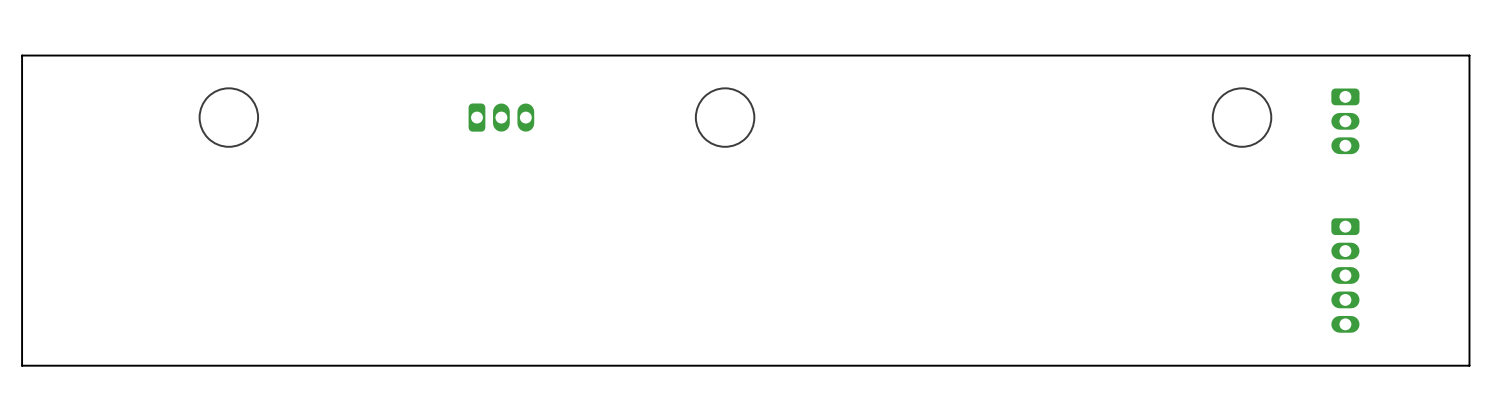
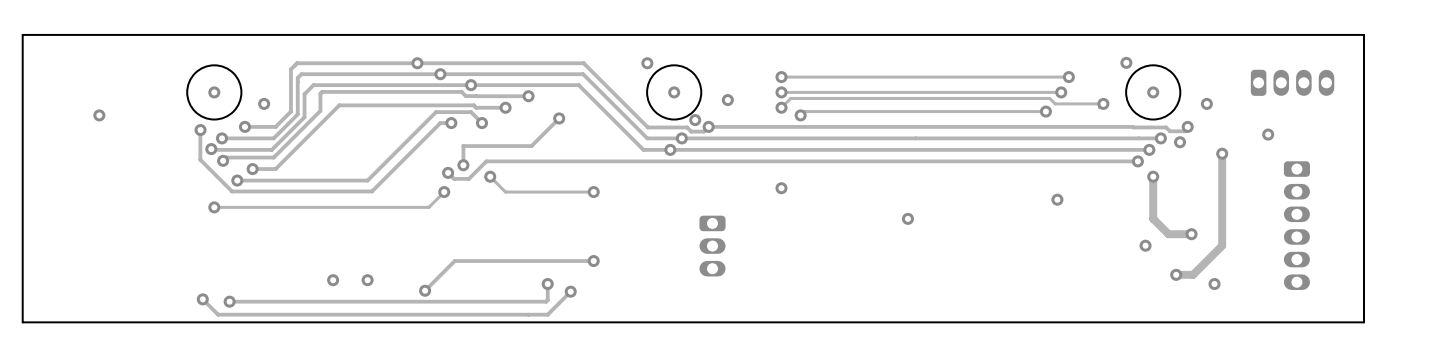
via: none -> (1126, 62)
via: none -> (417, 63)
via: none -> (647, 63)
via: none -> (440, 74)
via: none -> (781, 77)
track: none -> (1068, 77) (781, 77)
via: none -> (1068, 77)
part: none -> (1292, 82)
via: none -> (471, 85)
via: none -> (214, 92)
part: (501, 117) -> none
via: none -> (674, 92)
via: none -> (781, 92)
track: none -> (1061, 92) (781, 92)
via: none -> (1061, 92)
via: none -> (1153, 92)
track: none -> (476, 96) (465, 96) (461, 91) (322, 91) (320, 110) (273, 157) (226, 157) (223, 160)
track: none -> (528, 96) (476, 96)
via: none -> (528, 96)
part: (1345, 121) -> none
via: none -> (727, 100)
via: none -> (264, 103)
via: none -> (1103, 103)
via: none -> (1206, 103)
track: none -> (505, 107) (476, 107) (473, 105) (339, 105) (275, 169) (252, 169)
via: none -> (505, 107)
via: none -> (781, 107)
track: none -> (1099, 107) (1103, 103) (1055, 103) (1049, 98) (790, 98) (781, 107)
track: none -> (1045, 111) (804, 111) (800, 115)
via: none -> (1045, 111)
via: none -> (99, 115)
via: none -> (800, 115)
track: none -> (559, 118) (531, 146) (463, 146) (463, 165)
via: none -> (559, 118)
via: none -> (695, 120)
track: none -> (451, 123) (440, 123) (371, 191) (232, 191) (200, 159) (200, 130)
via: none -> (451, 123)
track: none -> (482, 123) (471, 112) (436, 112) (367, 180) (237, 180)
via: none -> (482, 123)
via: none -> (244, 126)
via: none -> (708, 126)
track: none -> (1187, 126) (1185, 131) (1169, 131) (1166, 127) (1132, 126) (708, 126) (703, 131) (691, 131) (687, 127) (647, 127) (583, 63) (297, 63) (290, 69) (290, 111) (275, 126) (244, 126)
via: none -> (1187, 126)
via: none -> (200, 130)
via: none -> (1268, 134)
via: none -> (221, 138)
via: none -> (681, 138)
track: none -> (1160, 138) (647, 138) (583, 74) (301, 74) (297, 77) (297, 114) (273, 138) (221, 138)
via: none -> (1160, 138)
via: none -> (1180, 142)
track: none -> (211, 149) (271, 149) (304, 117) (304, 94) (313, 85) (578, 85) (643, 149) (1149, 149)
via: none -> (211, 149)
via: none -> (670, 149)
via: none -> (1149, 149)
track: none -> (1222, 153) (1222, 245) (1193, 274) (1176, 274)
via: none -> (1222, 153)
via: none -> (223, 160)
track: none -> (1137, 161) (486, 161) (468, 178) (454, 178) (448, 172)
via: none -> (1137, 161)
via: none -> (463, 165)
via: none -> (252, 169)
via: none -> (448, 172)
track: none -> (490, 176) (505, 192) (593, 192)
via: none -> (490, 176)
track: none -> (1153, 176) (1153, 218) (1168, 234) (1191, 234)
via: none -> (1153, 176)
via: none -> (237, 180)
via: none -> (781, 188)
track: none -> (444, 192) (428, 207) (214, 207)
via: none -> (444, 192)
via: none -> (593, 192)
via: none -> (1057, 199)
via: none -> (214, 207)
via: none -> (907, 218)
part: none -> (1296, 225)
via: none -> (1191, 234)
part: (1345, 275) -> none
via: none -> (1145, 245)
part: none -> (712, 246)
track: none -> (593, 261) (454, 261) (425, 290)
via: none -> (593, 261)
via: none -> (1176, 274)
via: none -> (333, 280)
via: none -> (367, 280)
track: none -> (547, 284) (546, 301) (229, 301)
via: none -> (547, 284)
via: none -> (1214, 284)
via: none -> (425, 290)
track: none -> (570, 291) (547, 314) (218, 314) (202, 299)
via: none -> (570, 291)
via: none -> (202, 299)
via: none -> (229, 301)

